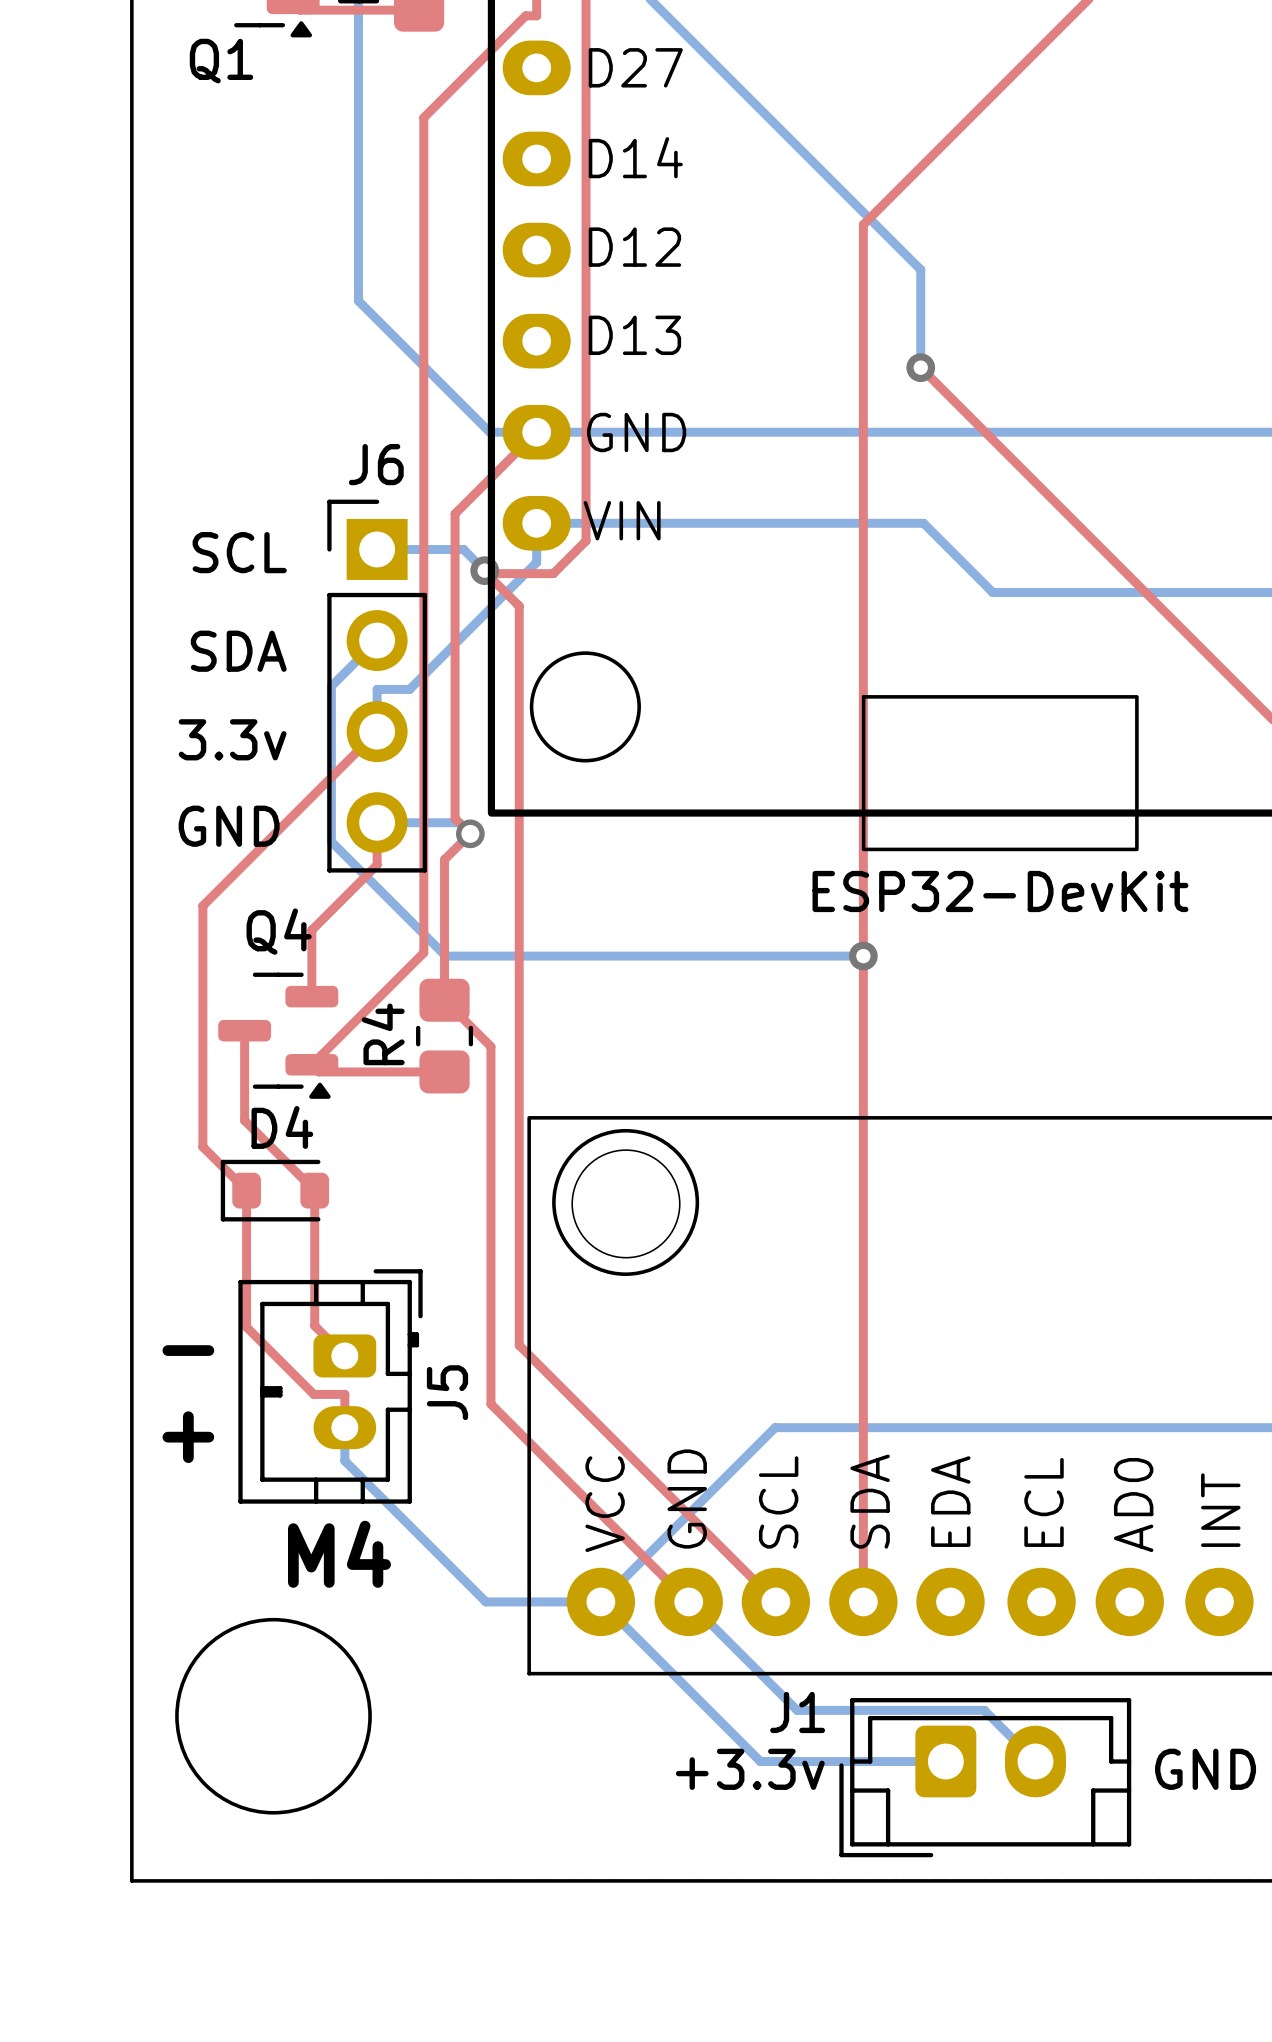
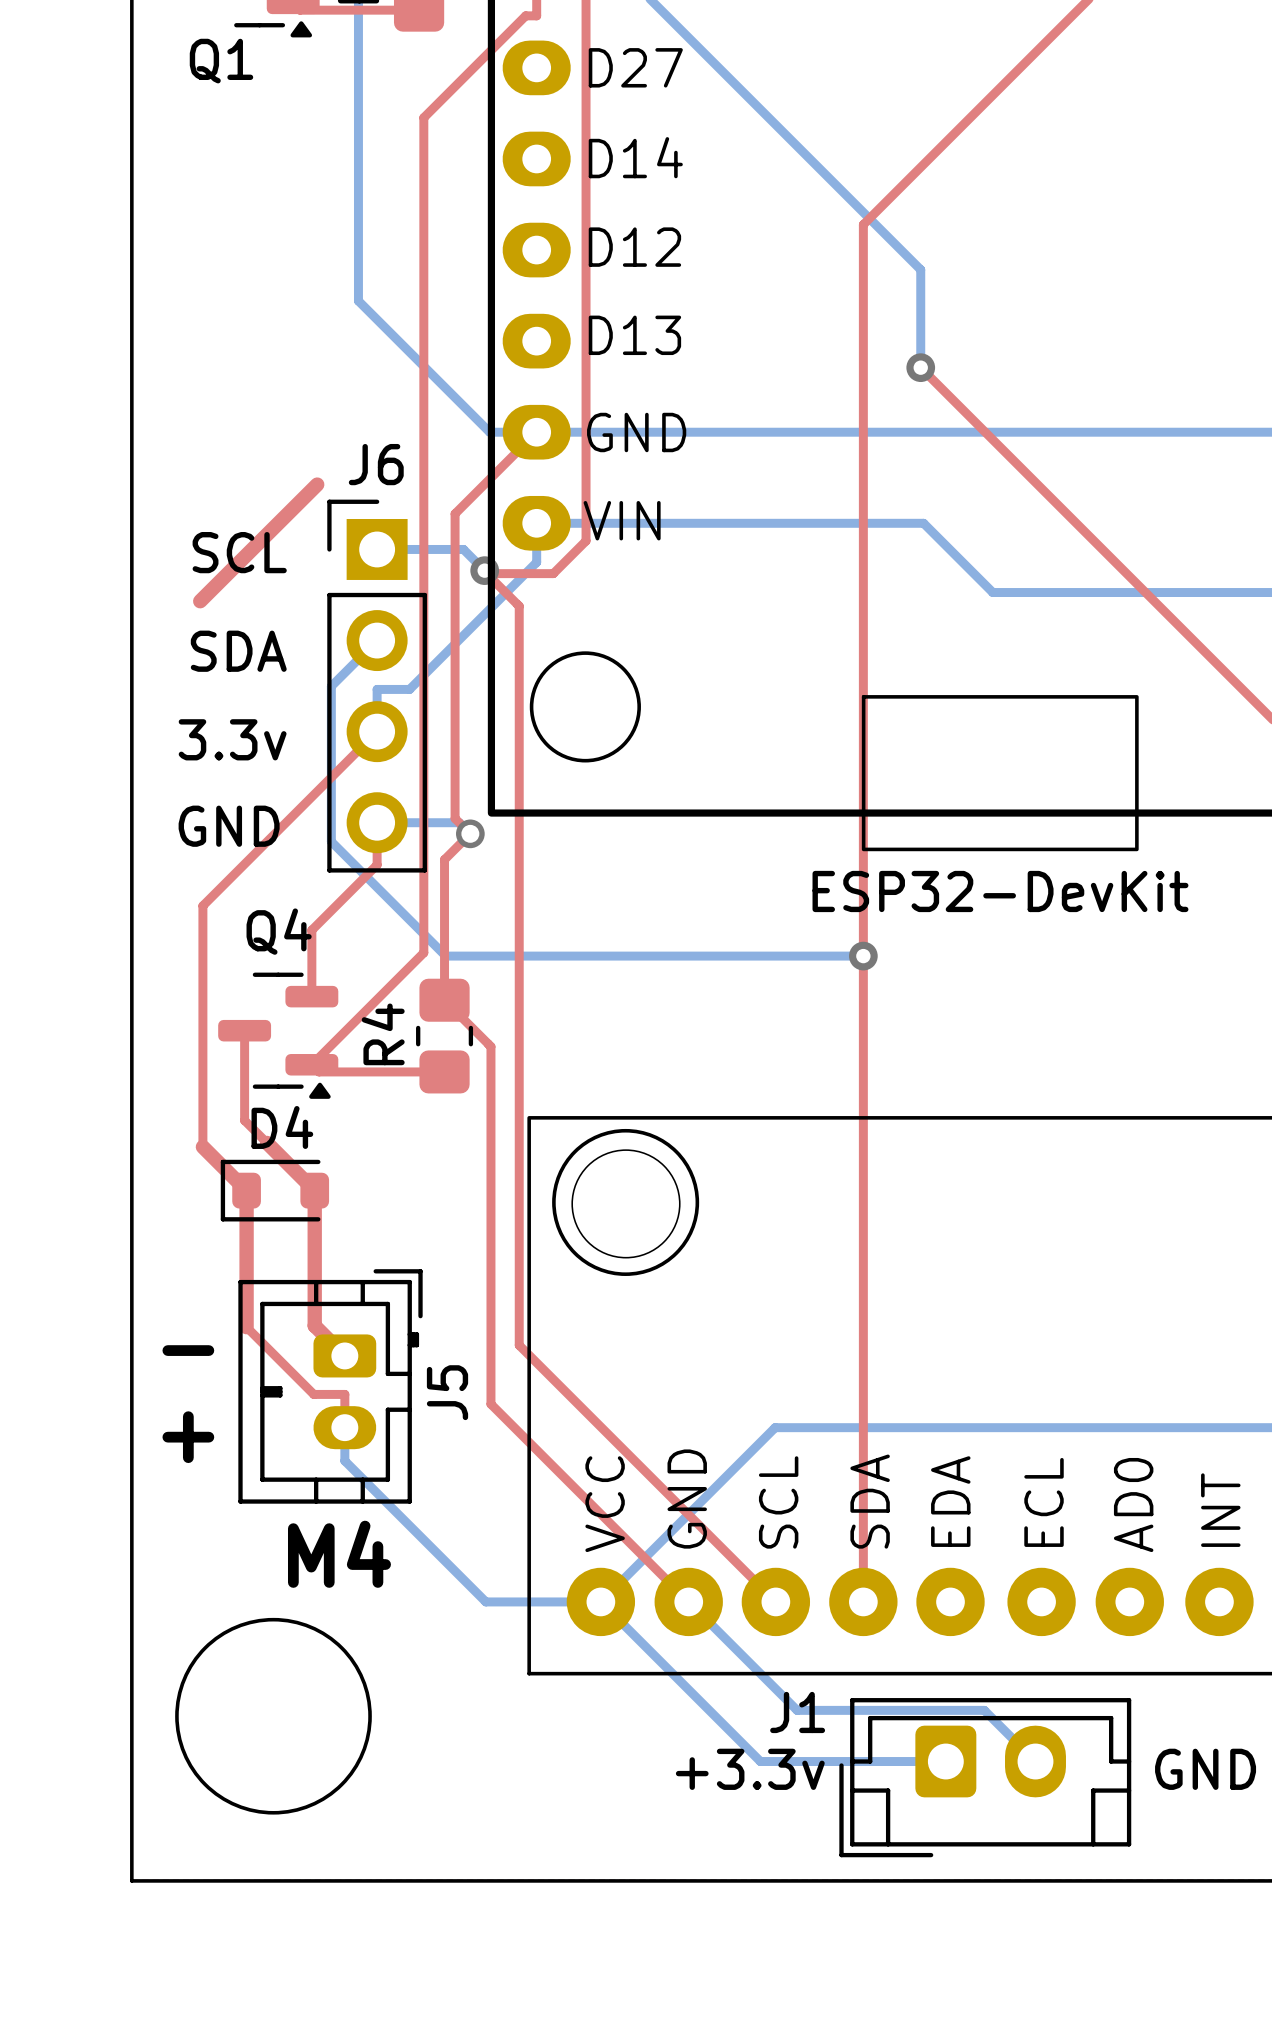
top track: none -> (317, 484) (200, 601)
top track width: thin (267, 1142) (314, 1190) (314, 1325) (344, 1355) -> thick (267, 1142) (314, 1190) (314, 1325) (344, 1355)
top track width: thin (202, 1146) (246, 1190) (246, 1327) -> thick (202, 1146) (246, 1190) (246, 1327)

